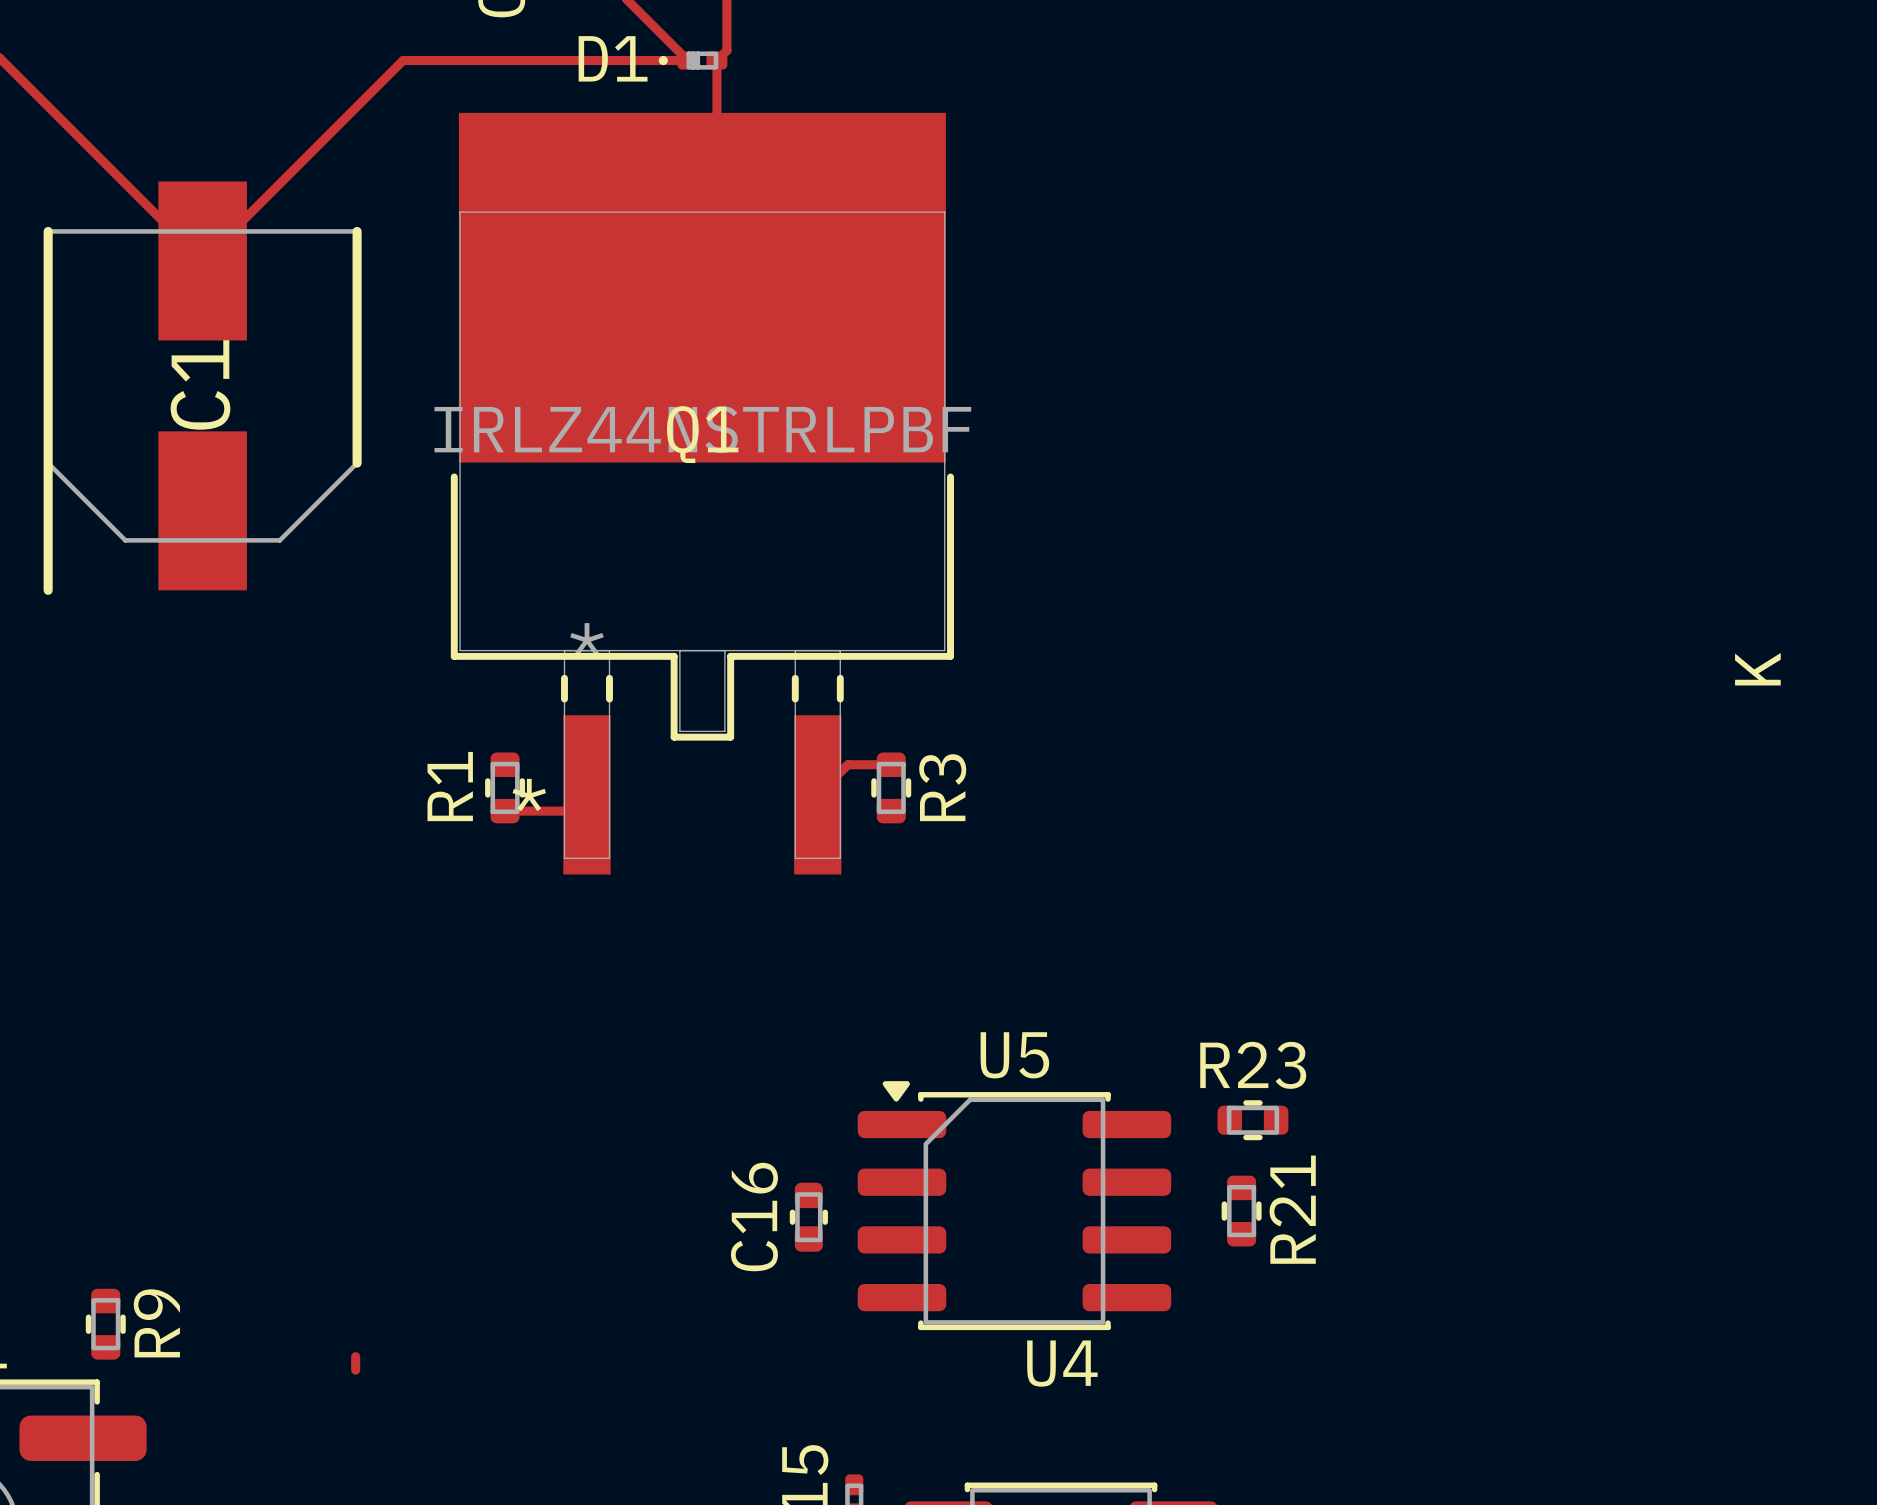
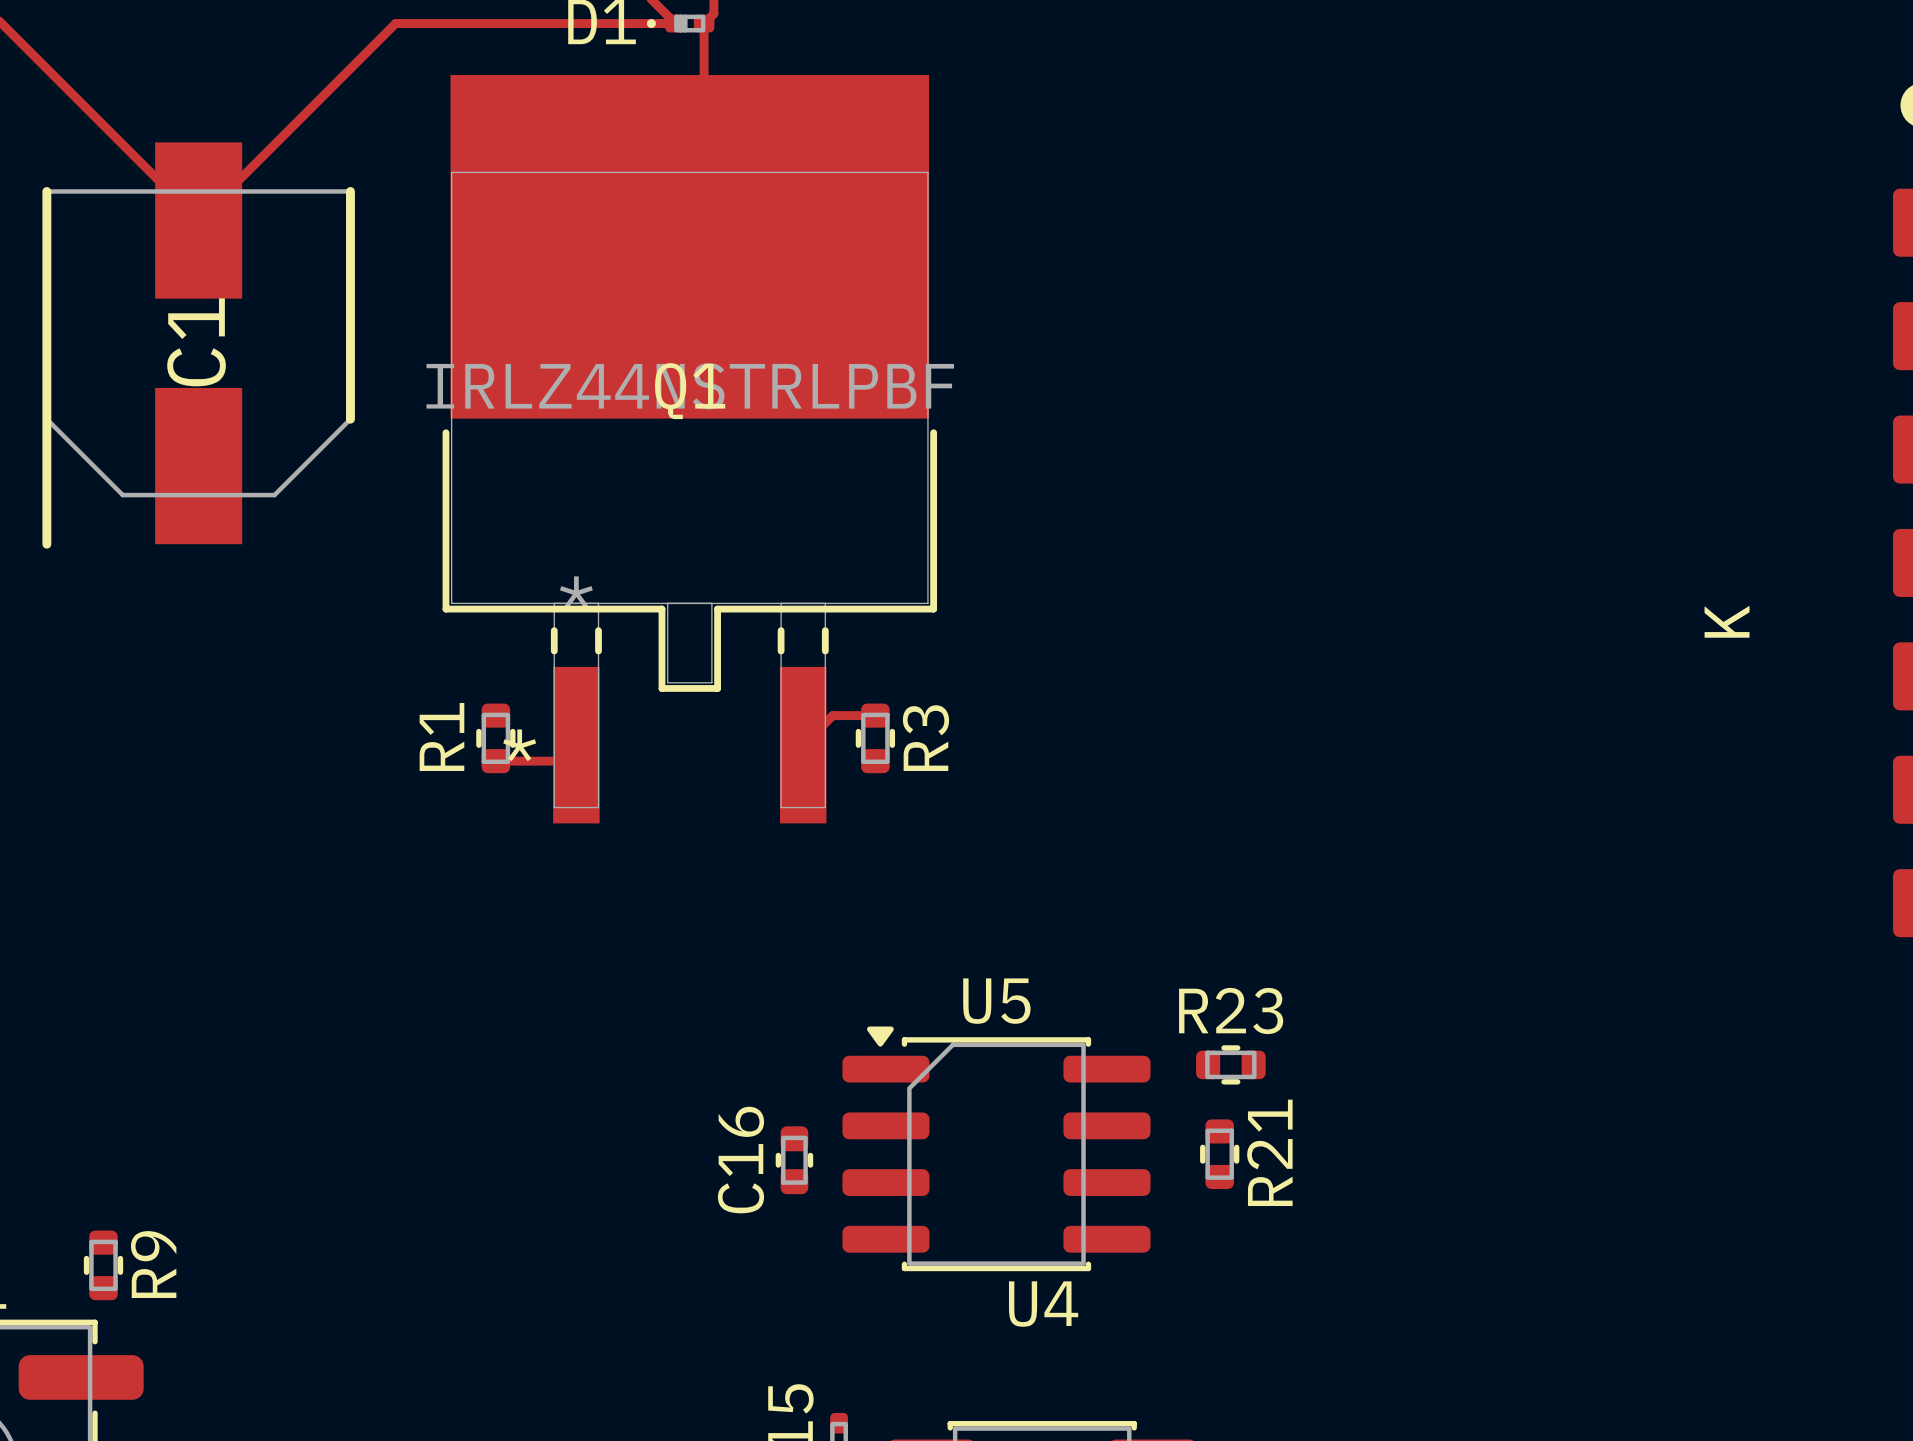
top track: (355, 1356) (355, 1370) -> none

